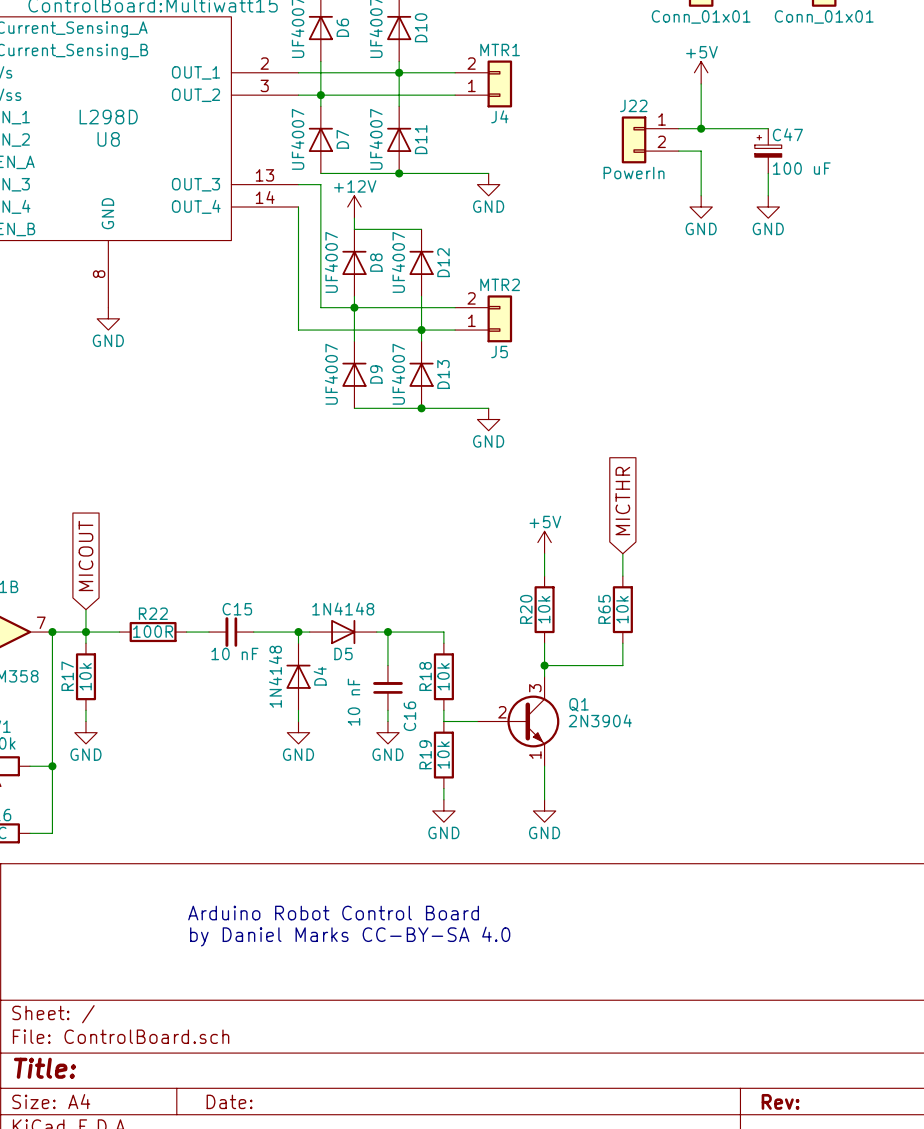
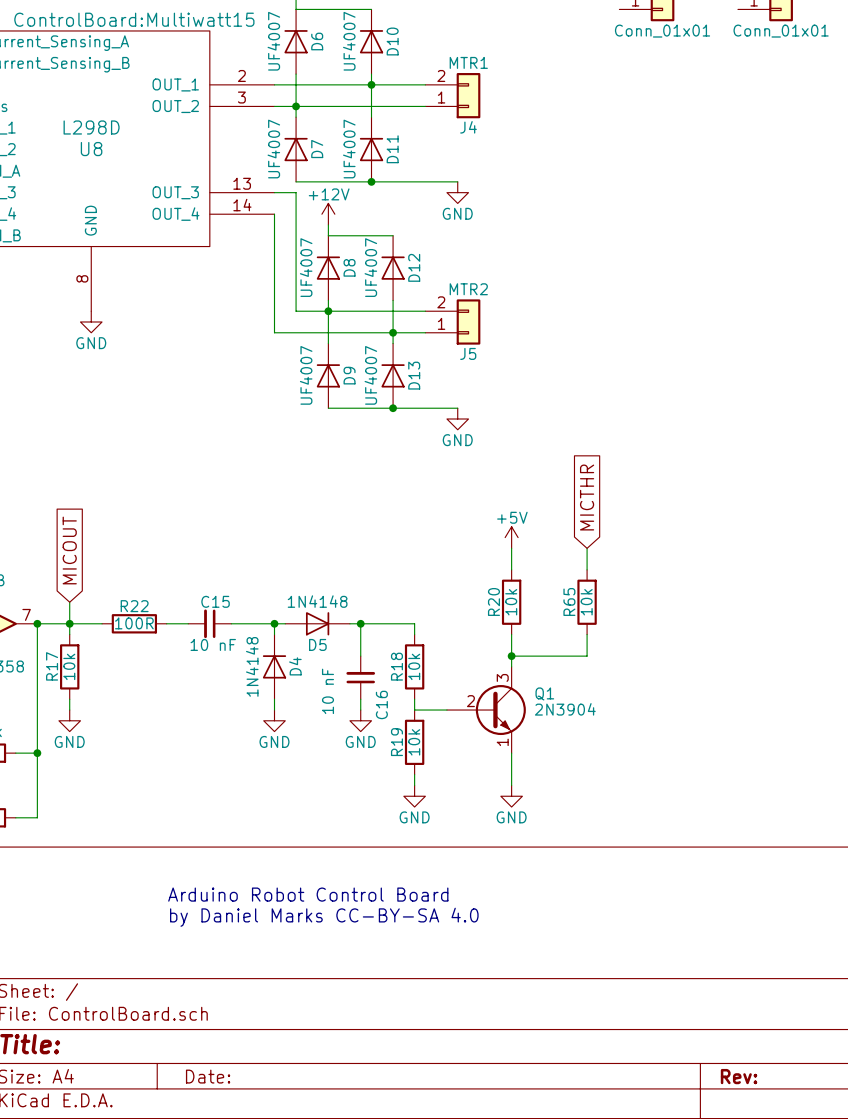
power symbol: +5V (701, 72) -> none
wire: (701, 83) (701, 128) -> none
wire: (678, 128) (768, 128) -> none
junction: (701, 128) -> none
J22: PowerIn (650, 139) -> none
wire: (678, 151) (701, 151) (701, 195) -> none
C47: 100 uF (768, 151) -> none
wire: (768, 173) (768, 195) -> none
power symbol: GND (701, 207) -> none
power symbol: GND (768, 207) -> none

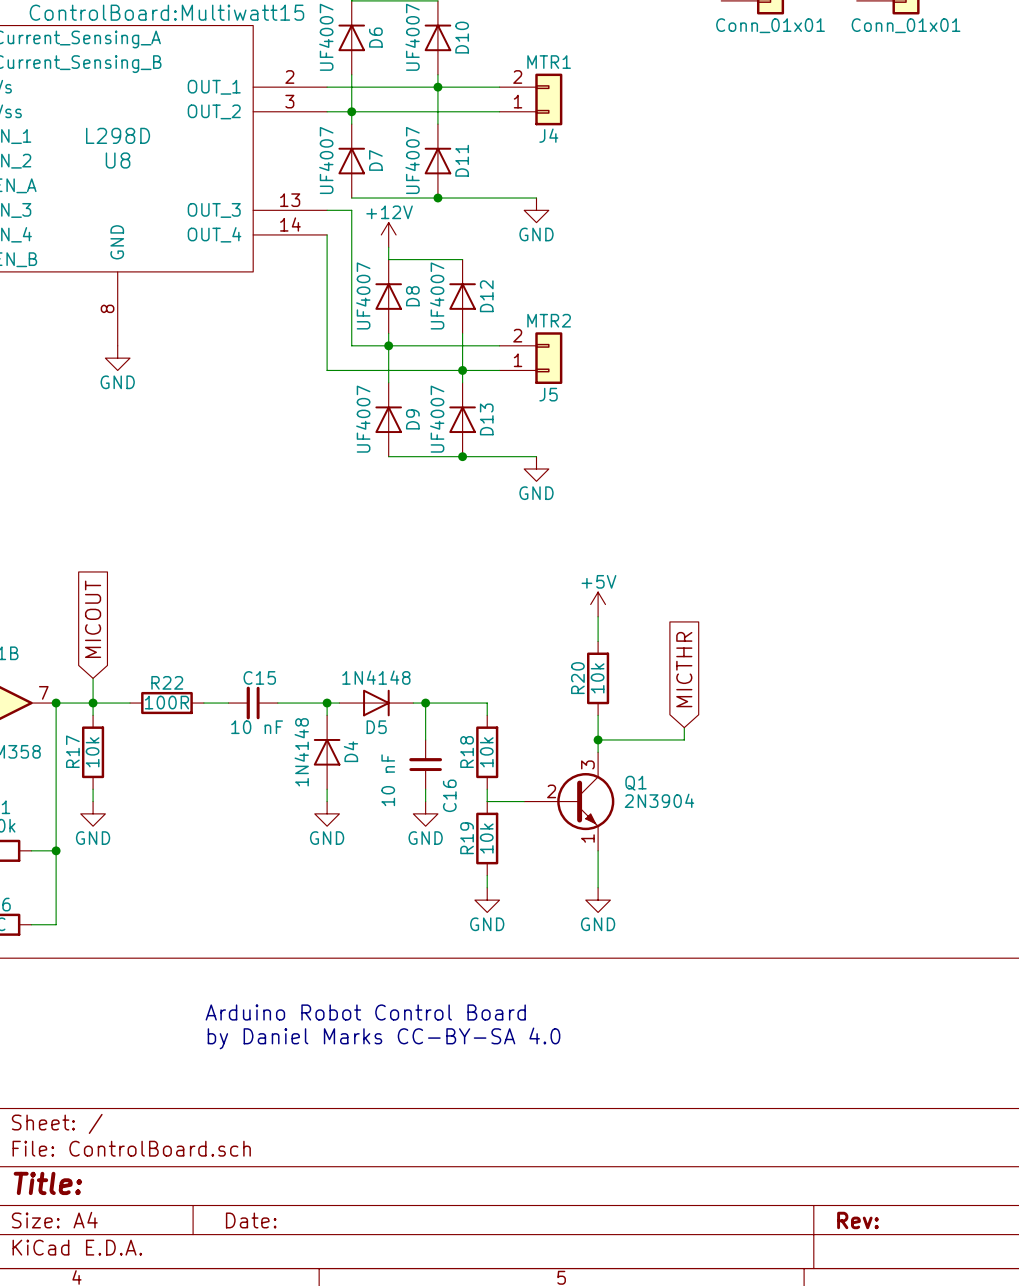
global label position: MICTHR (587, 497) -> MICTHR (684, 669)
wire: (587, 548) (587, 569) -> none
R65: 10k (587, 602) -> none
wire: (587, 634) (587, 645) -> none

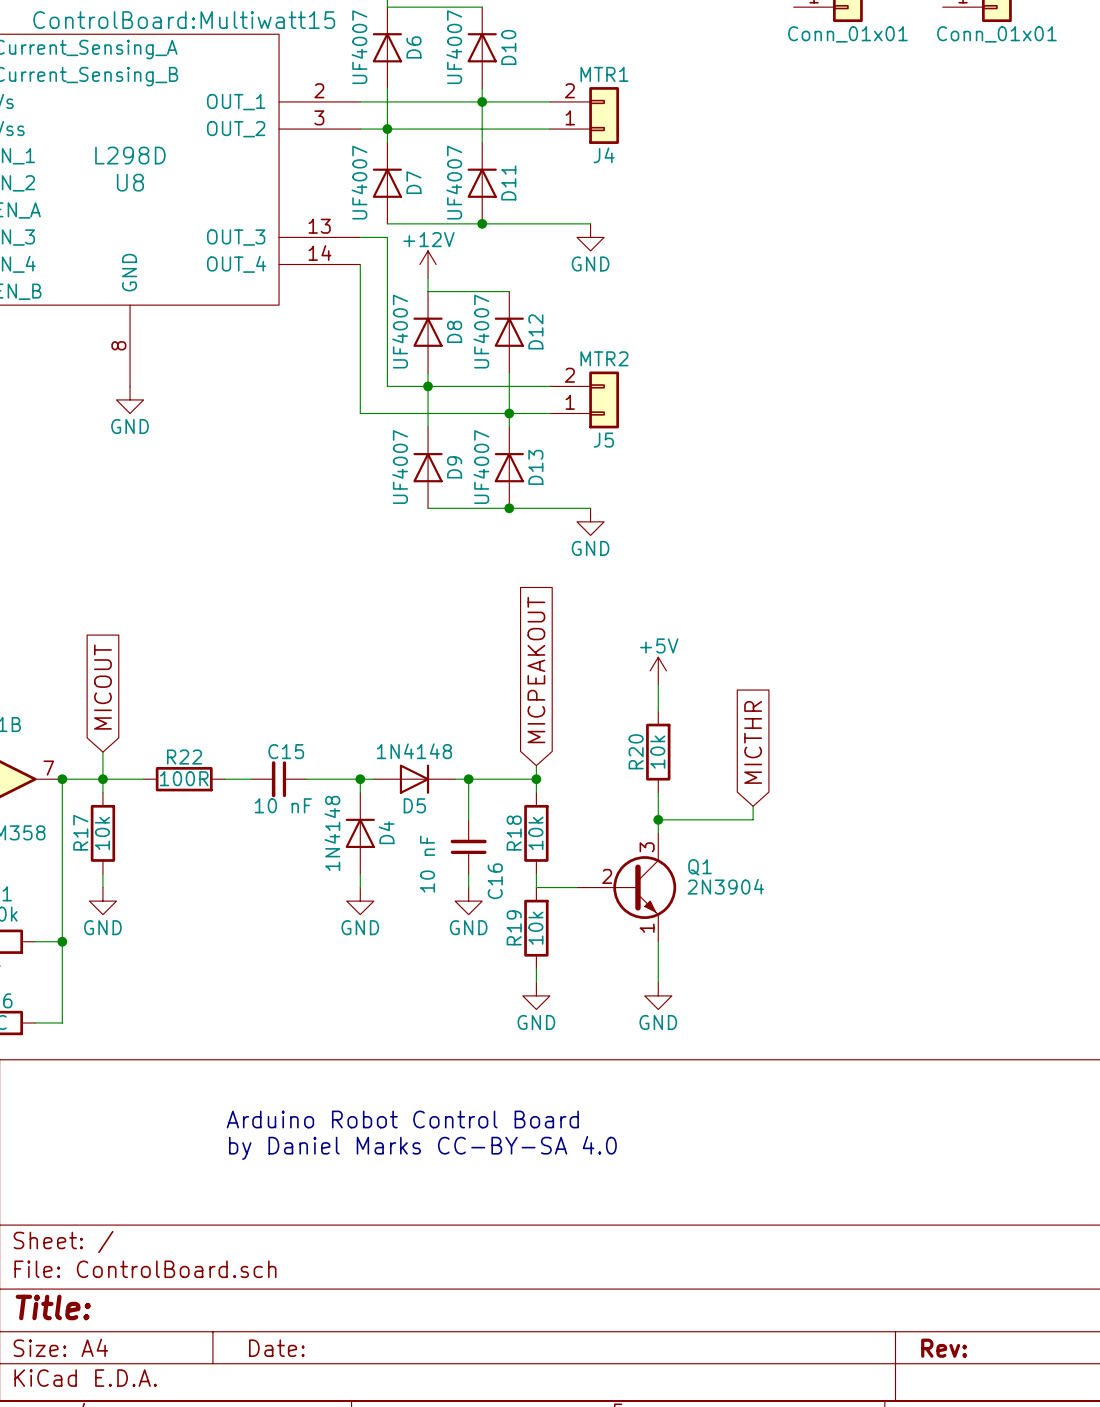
global label: none -> MICPEAKOUT (536, 670)
wire: none -> (536, 765) (536, 779)
junction: none -> (536, 779)

